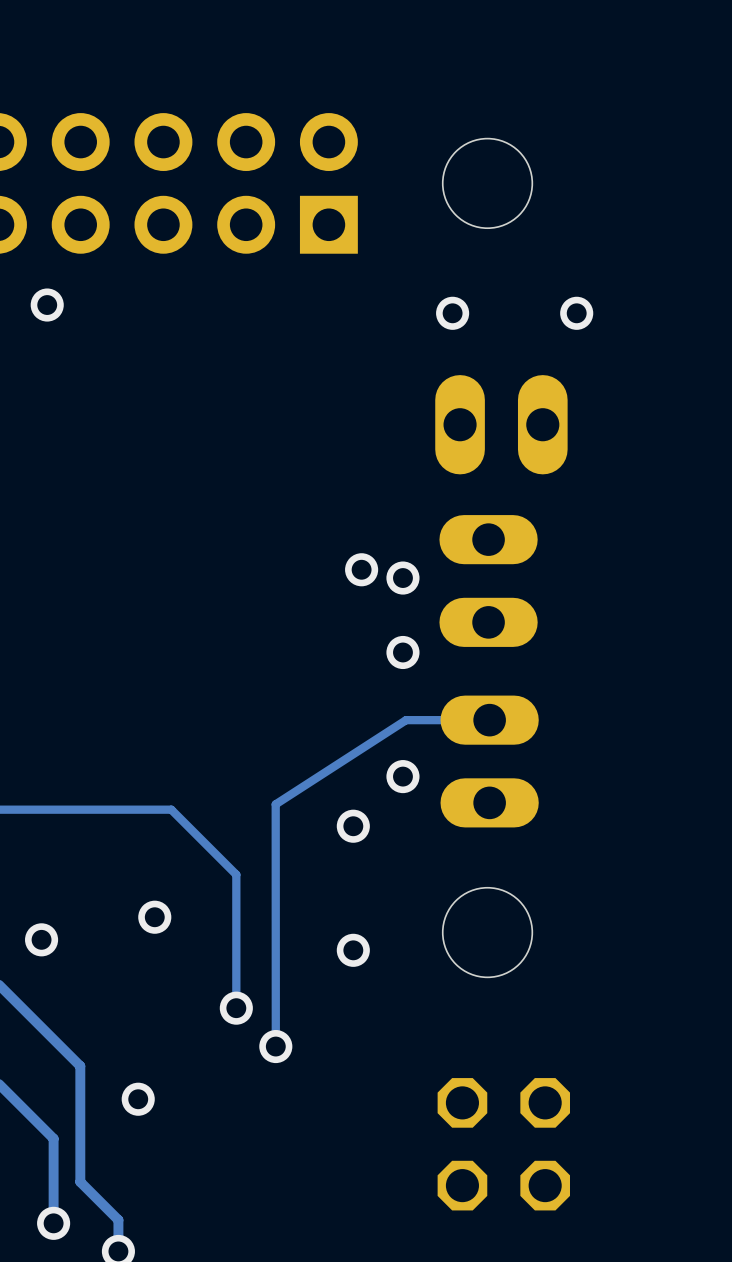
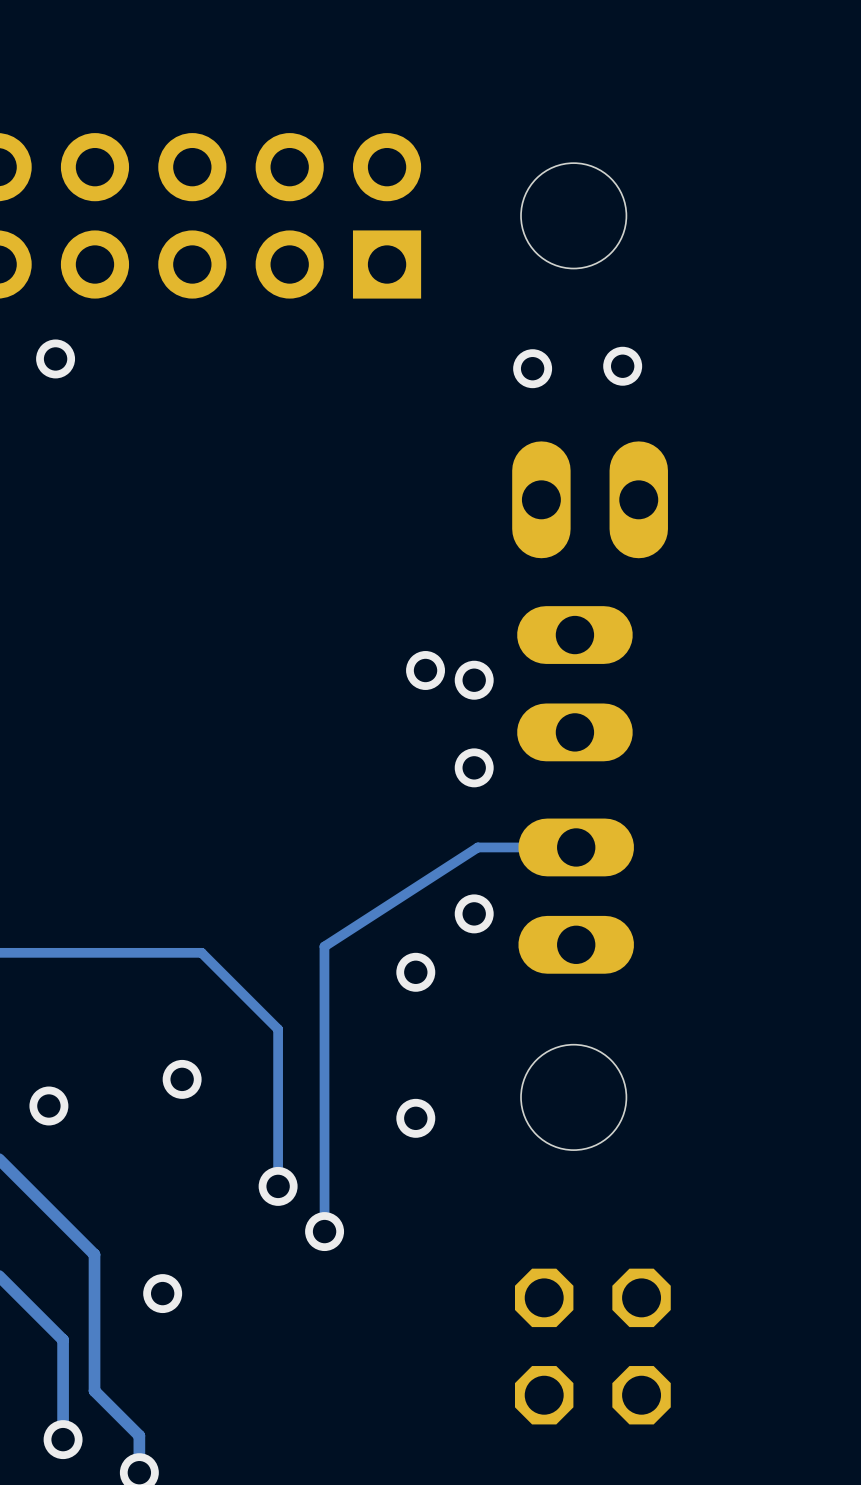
via position: (576, 313) -> (622, 366)

